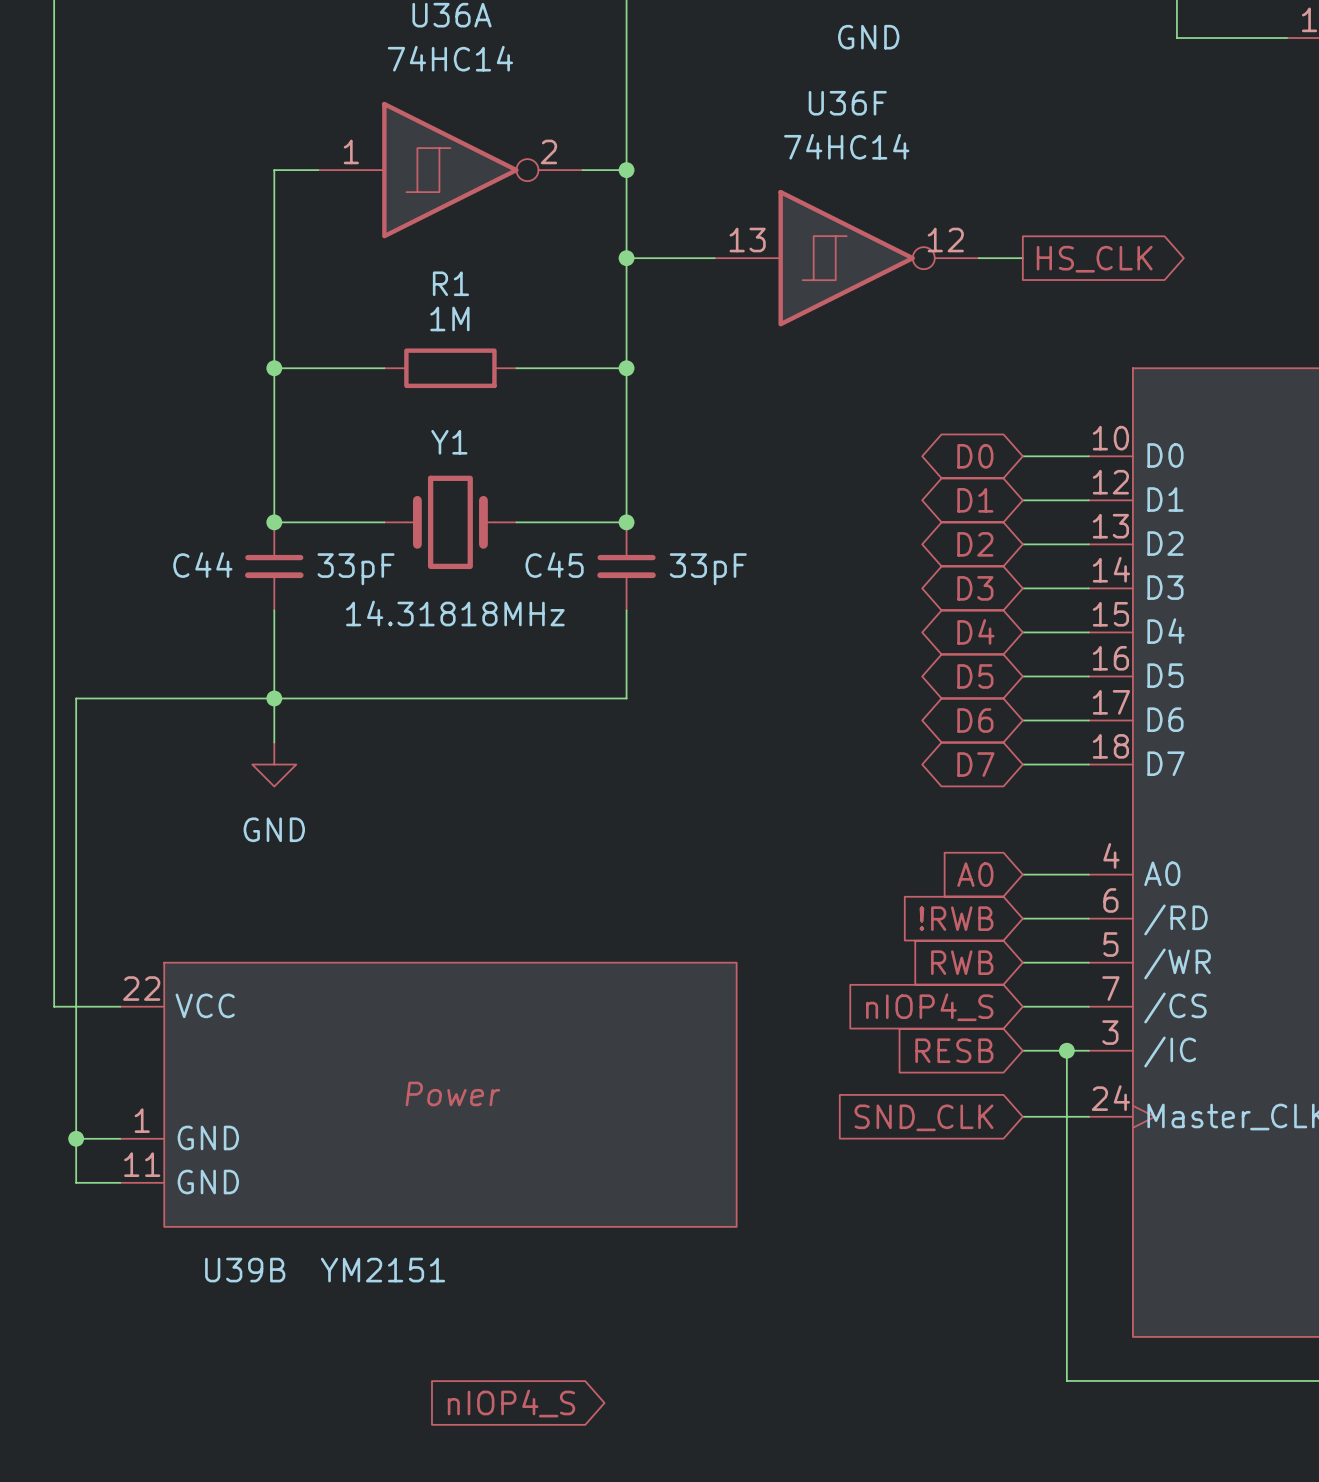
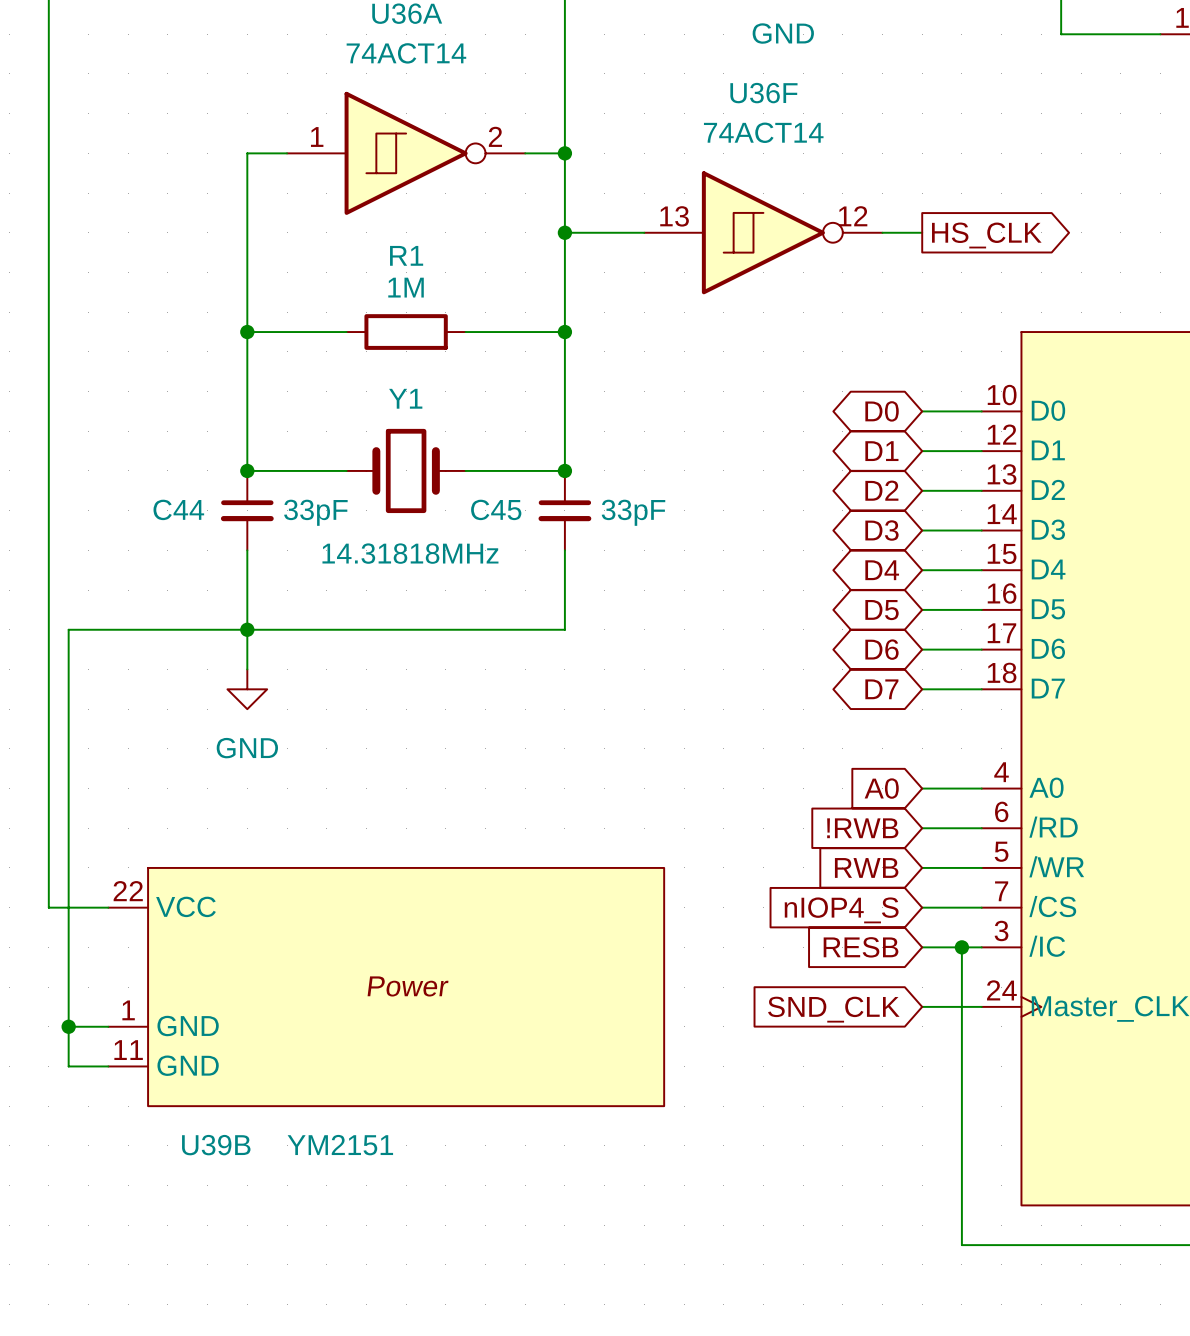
U36A value: 74HC14 (450, 58) -> 74ACT14 (406, 53)
U36F value: 74HC14 (846, 146) -> 74ACT14 (763, 132)
global label: nIOP4_S (511, 1403) -> none

